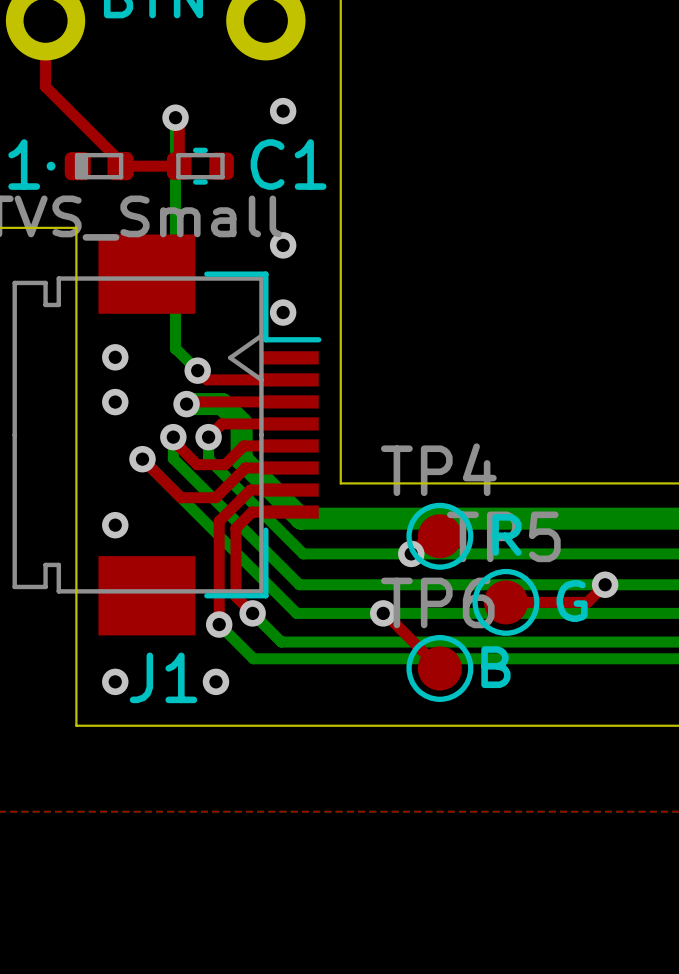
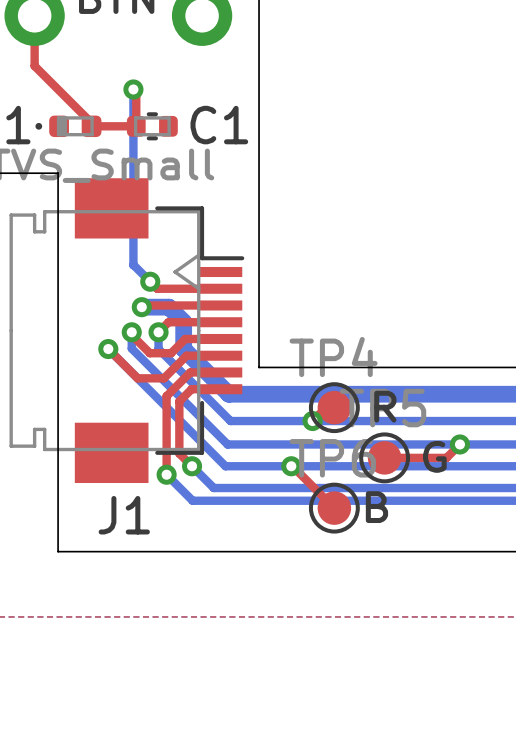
via: (283, 111) -> none
via: (283, 245) -> none
via: (283, 312) -> none
via: (115, 357) -> none
via: (115, 402) -> none
via: (115, 525) -> none
via: (115, 681) -> none
via: (215, 681) -> none

